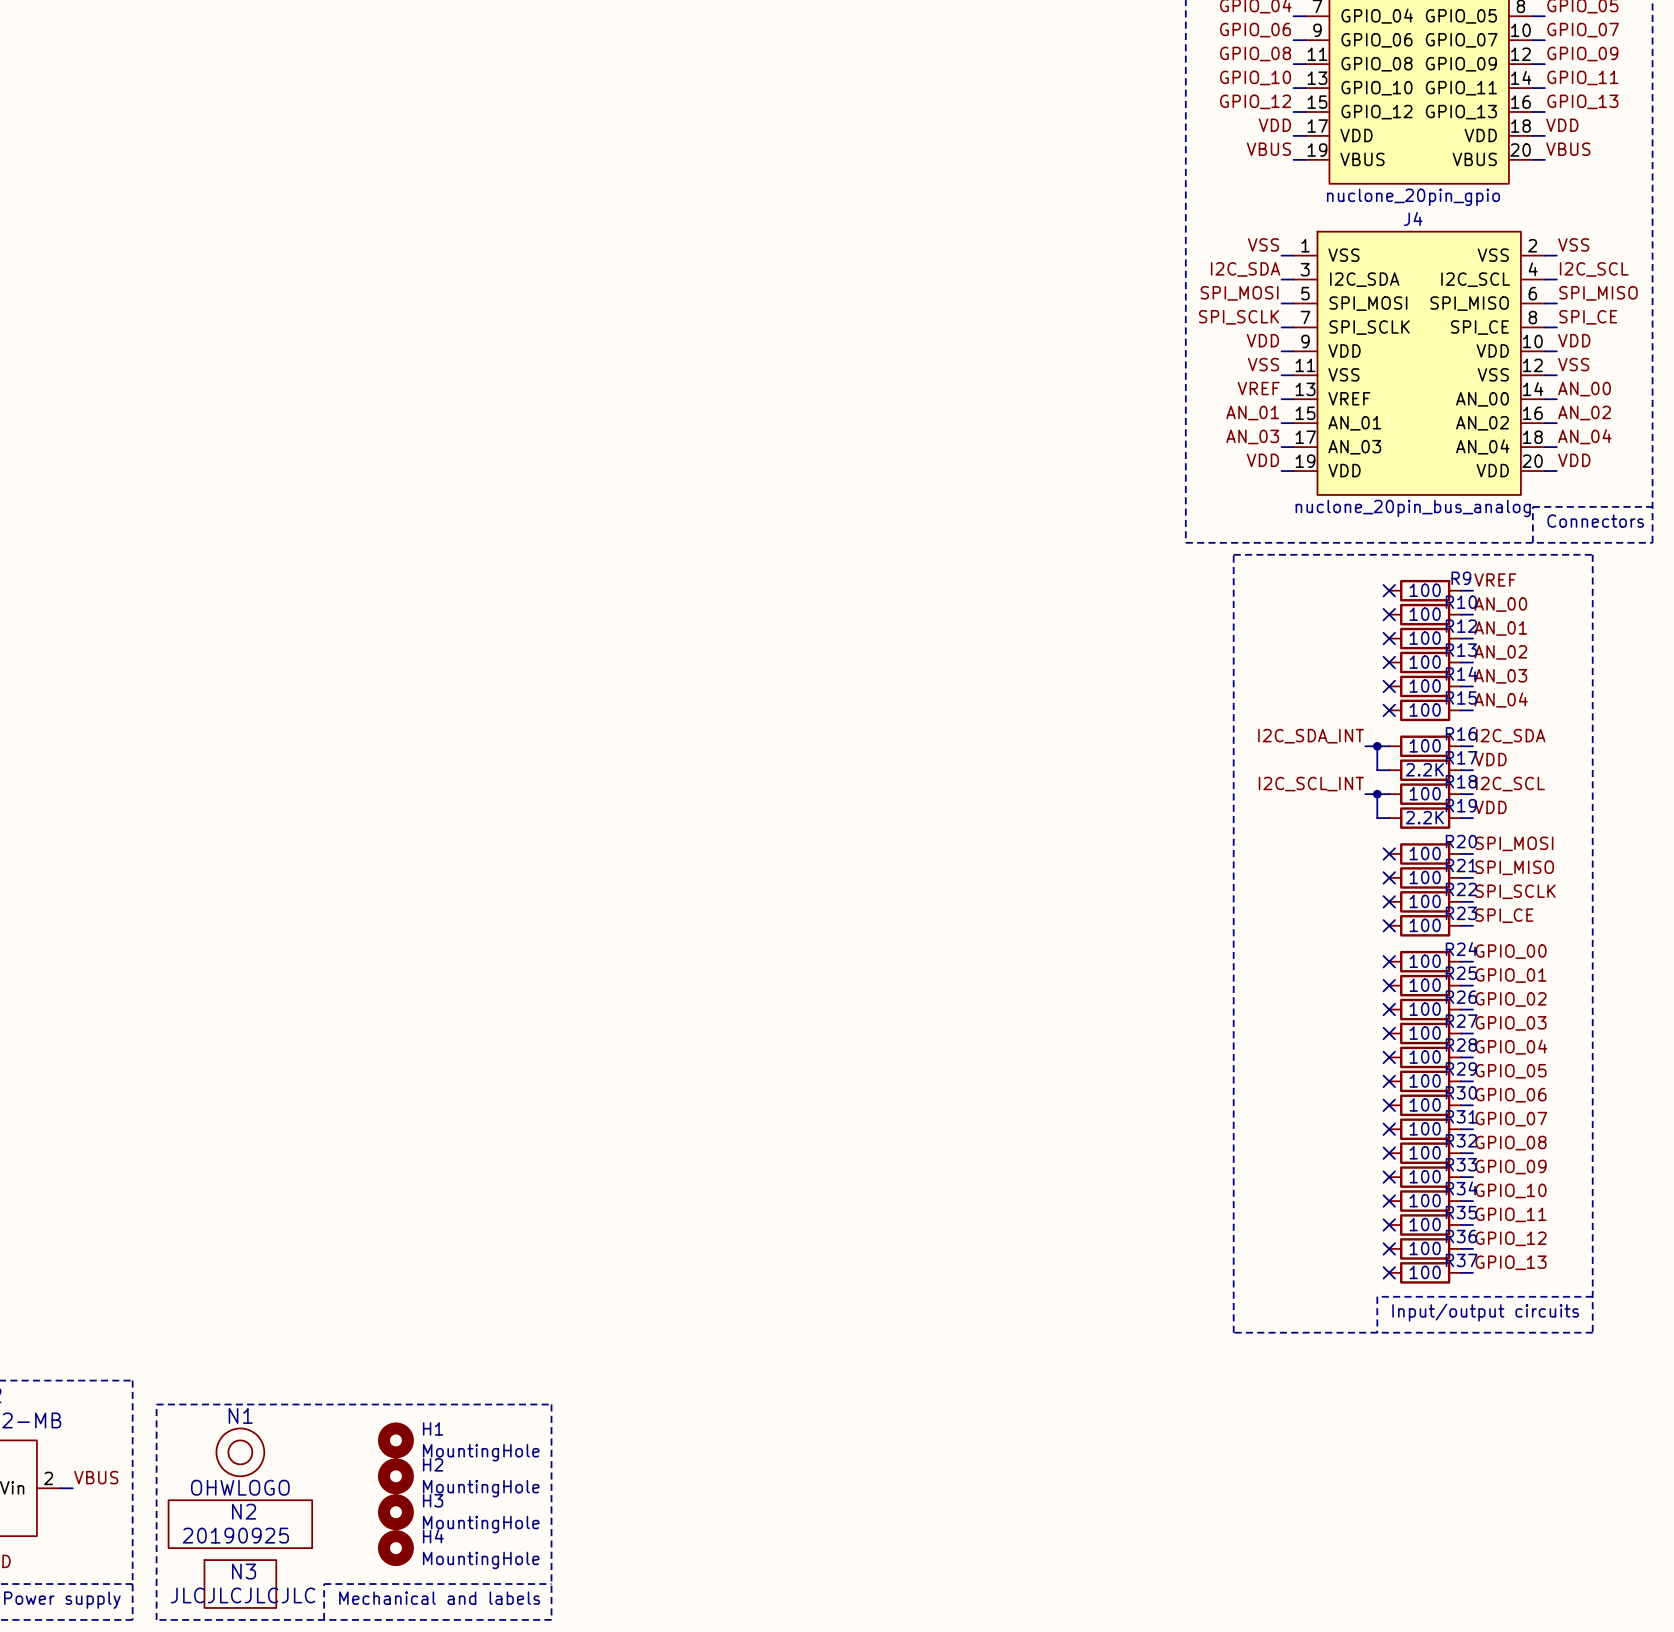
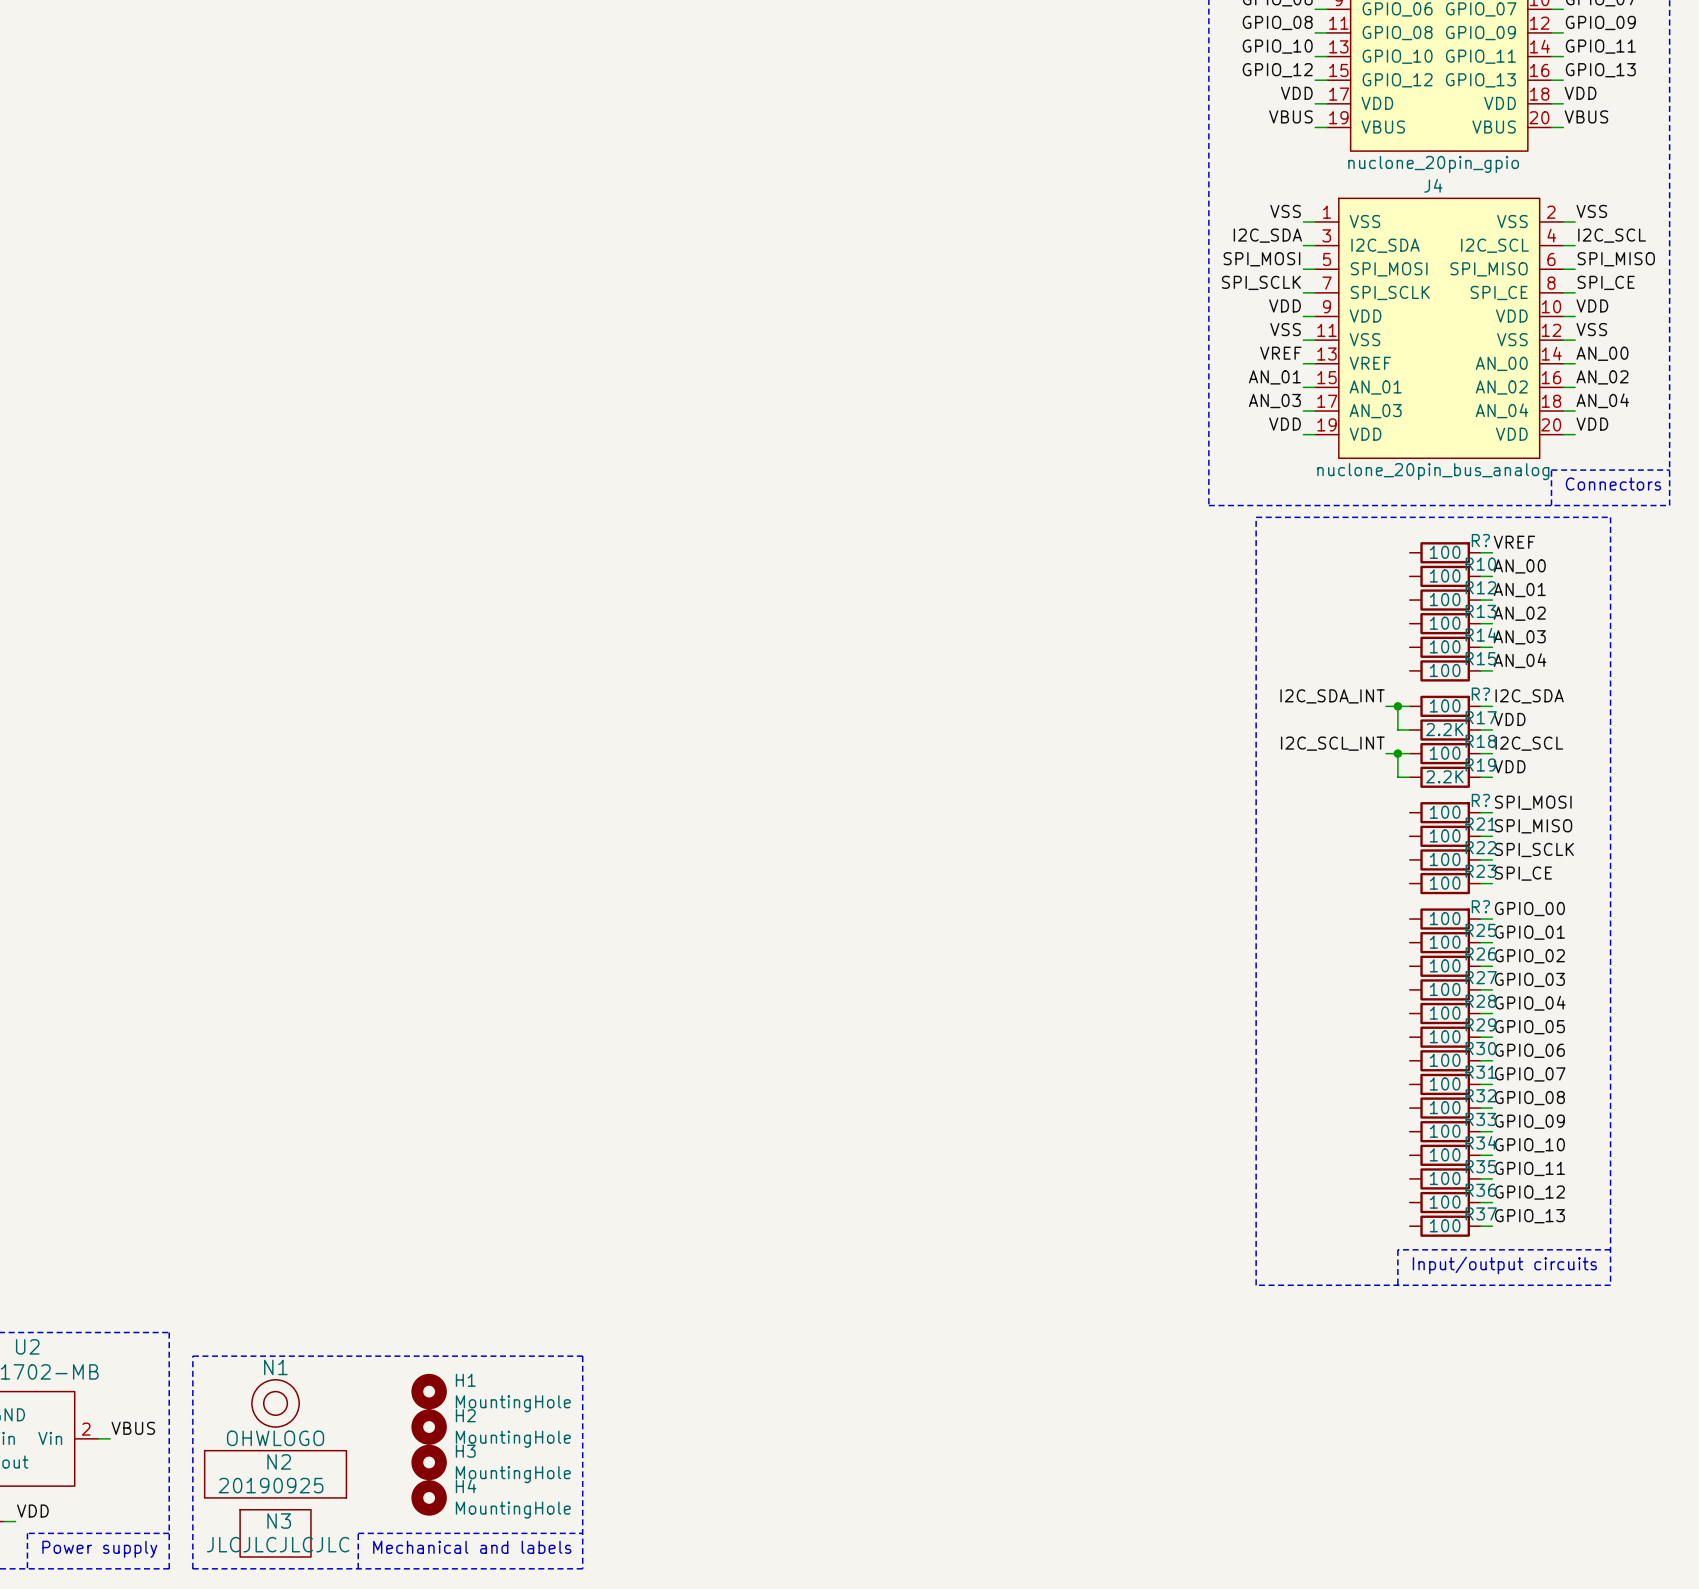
R9 name: R9 (1461, 578) -> R? (1480, 540)
no-connect mark: (1389, 590) -> none
no-connect mark: (1389, 614) -> none
no-connect mark: (1389, 638) -> none
no-connect mark: (1389, 662) -> none
no-connect mark: (1389, 686) -> none
no-connect mark: (1389, 710) -> none
R16 name: R16 (1461, 733) -> R? (1480, 694)
R20 name: R20 (1461, 841) -> R? (1480, 800)
no-connect mark: (1389, 853) -> none
no-connect mark: (1389, 877) -> none
no-connect mark: (1389, 901) -> none
no-connect mark: (1389, 925) -> none
R24 name: R24 (1461, 949) -> R? (1480, 906)
no-connect mark: (1389, 961) -> none
no-connect mark: (1389, 985) -> none
no-connect mark: (1389, 1009) -> none
no-connect mark: (1389, 1033) -> none
no-connect mark: (1389, 1057) -> none
no-connect mark: (1389, 1081) -> none
no-connect mark: (1389, 1105) -> none
no-connect mark: (1389, 1129) -> none
no-connect mark: (1389, 1153) -> none
no-connect mark: (1389, 1177) -> none
no-connect mark: (1389, 1201) -> none
no-connect mark: (1389, 1224) -> none
no-connect mark: (1389, 1248) -> none
no-connect mark: (1389, 1272) -> none

